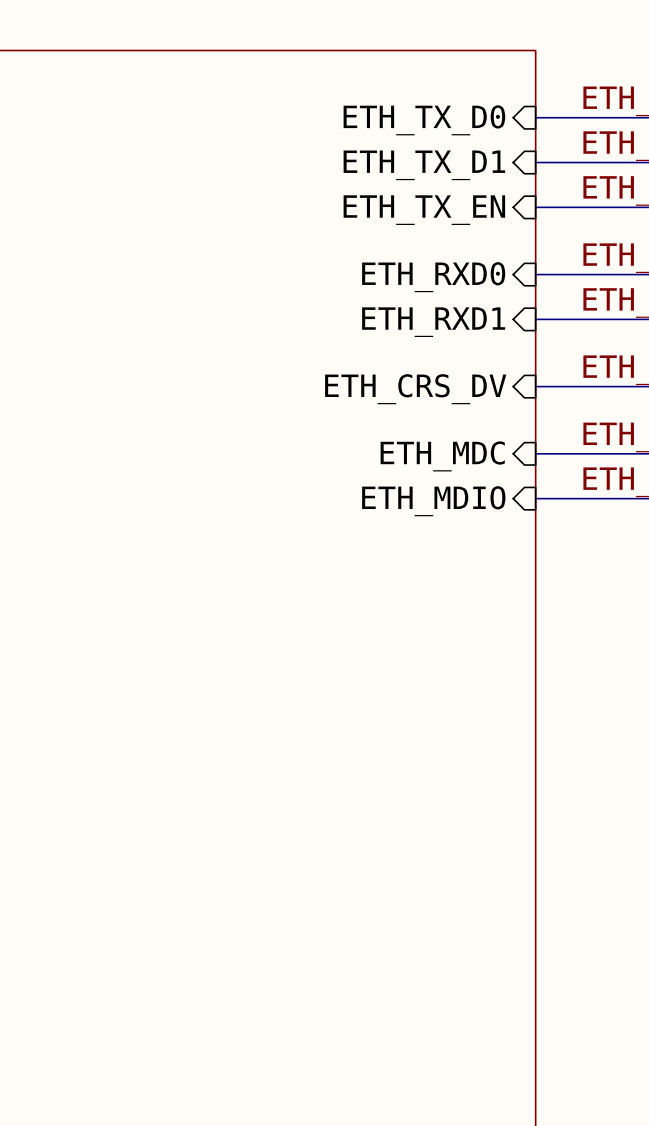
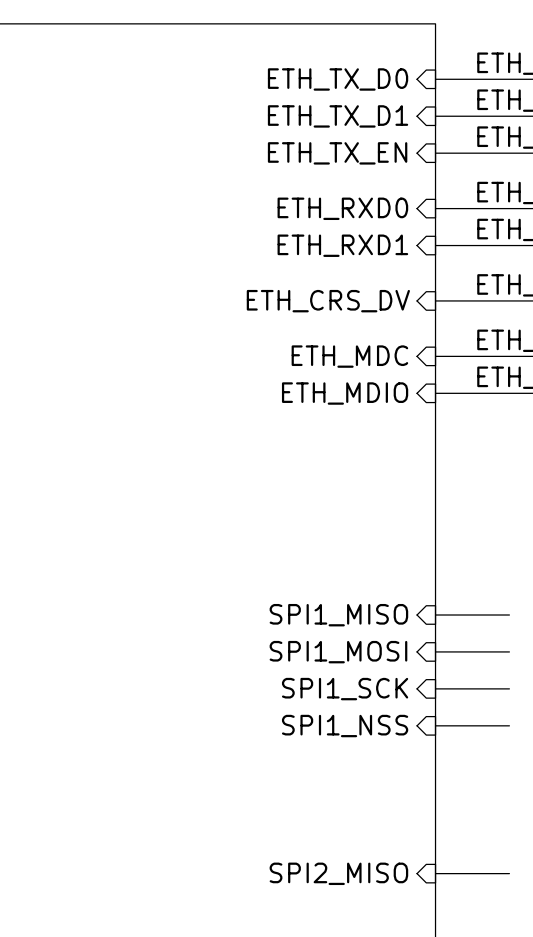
wire: none -> (435, 615) (509, 615)
sheet pin: none -> SPI1_MISO (338, 615)
wire: none -> (435, 651) (509, 651)
sheet pin: none -> SPI1_MOSI (338, 652)
wire: none -> (435, 688) (509, 688)
sheet pin: none -> SPI1_SCK (345, 689)
wire: none -> (435, 725) (509, 725)
sheet pin: none -> SPI1_NSS (345, 726)
wire: none -> (435, 873) (509, 873)
sheet pin: none -> SPI2_MISO (338, 873)

